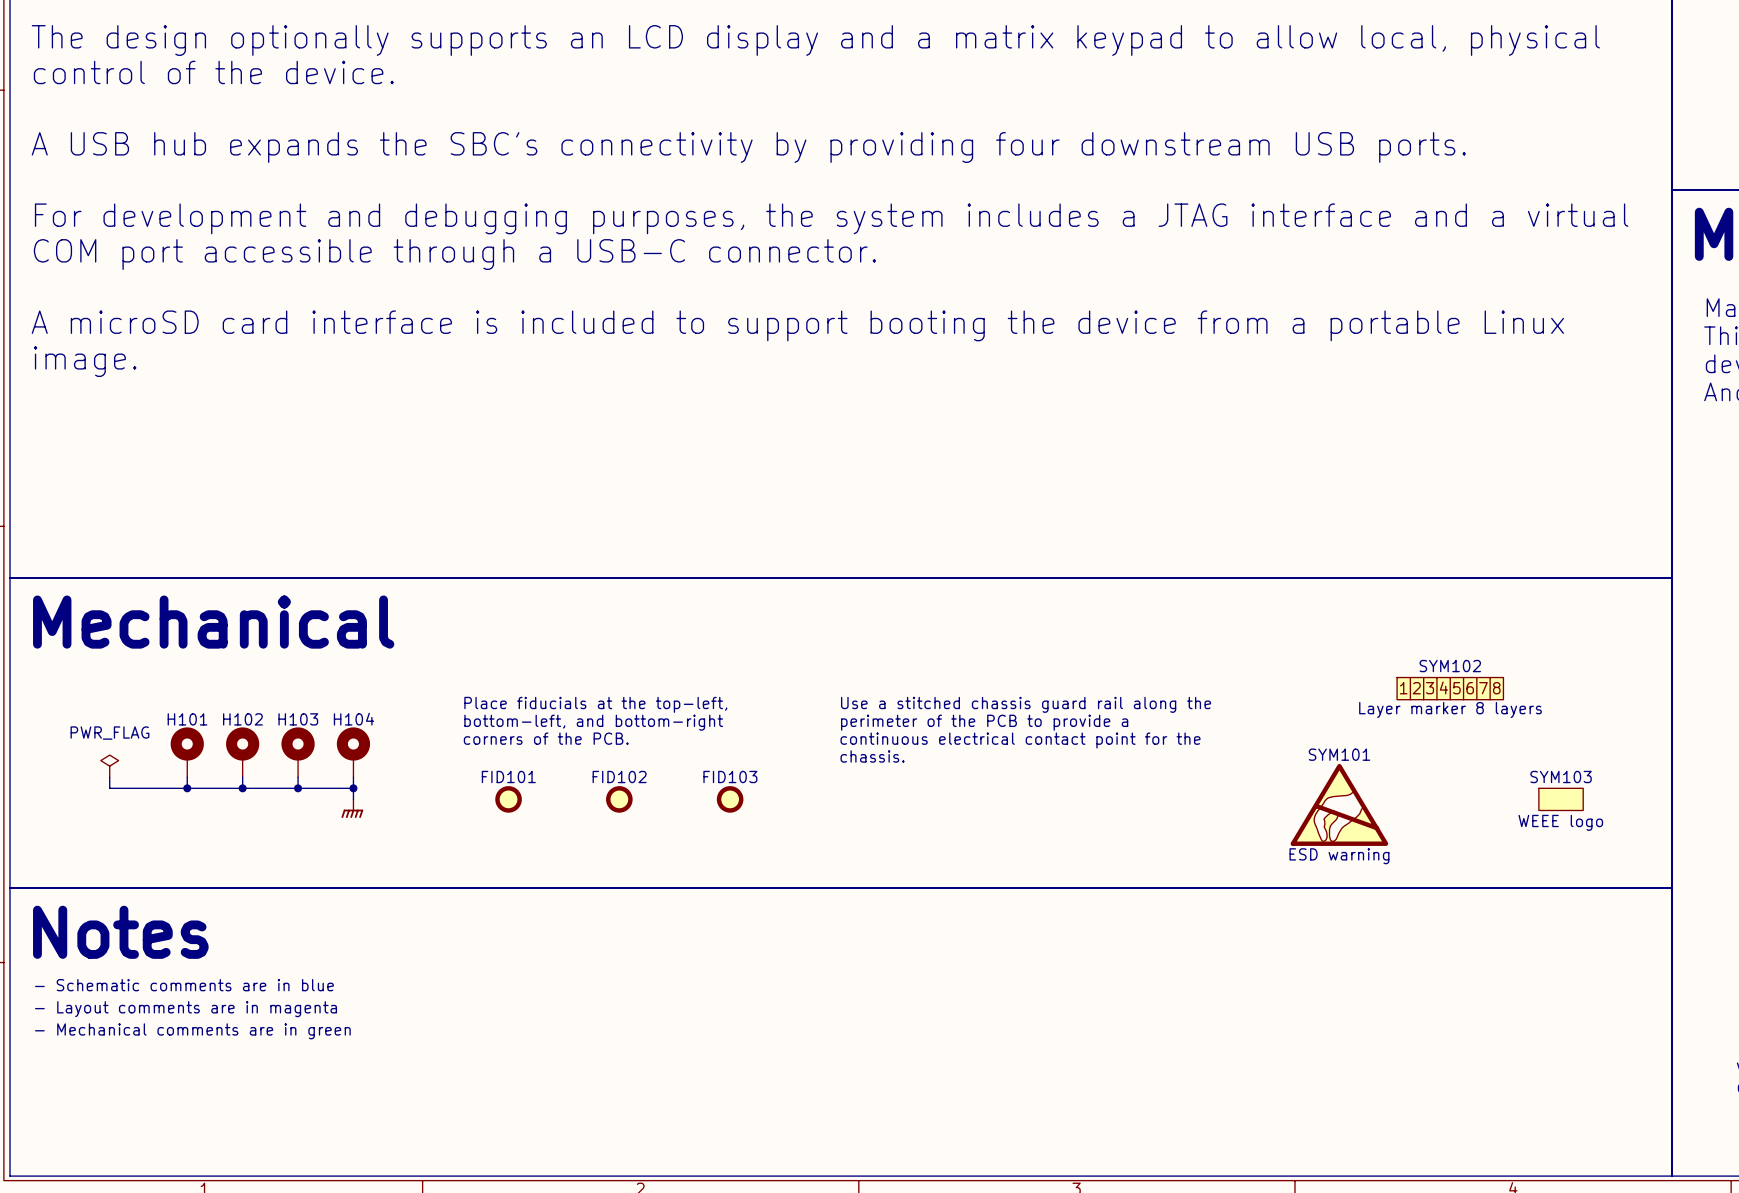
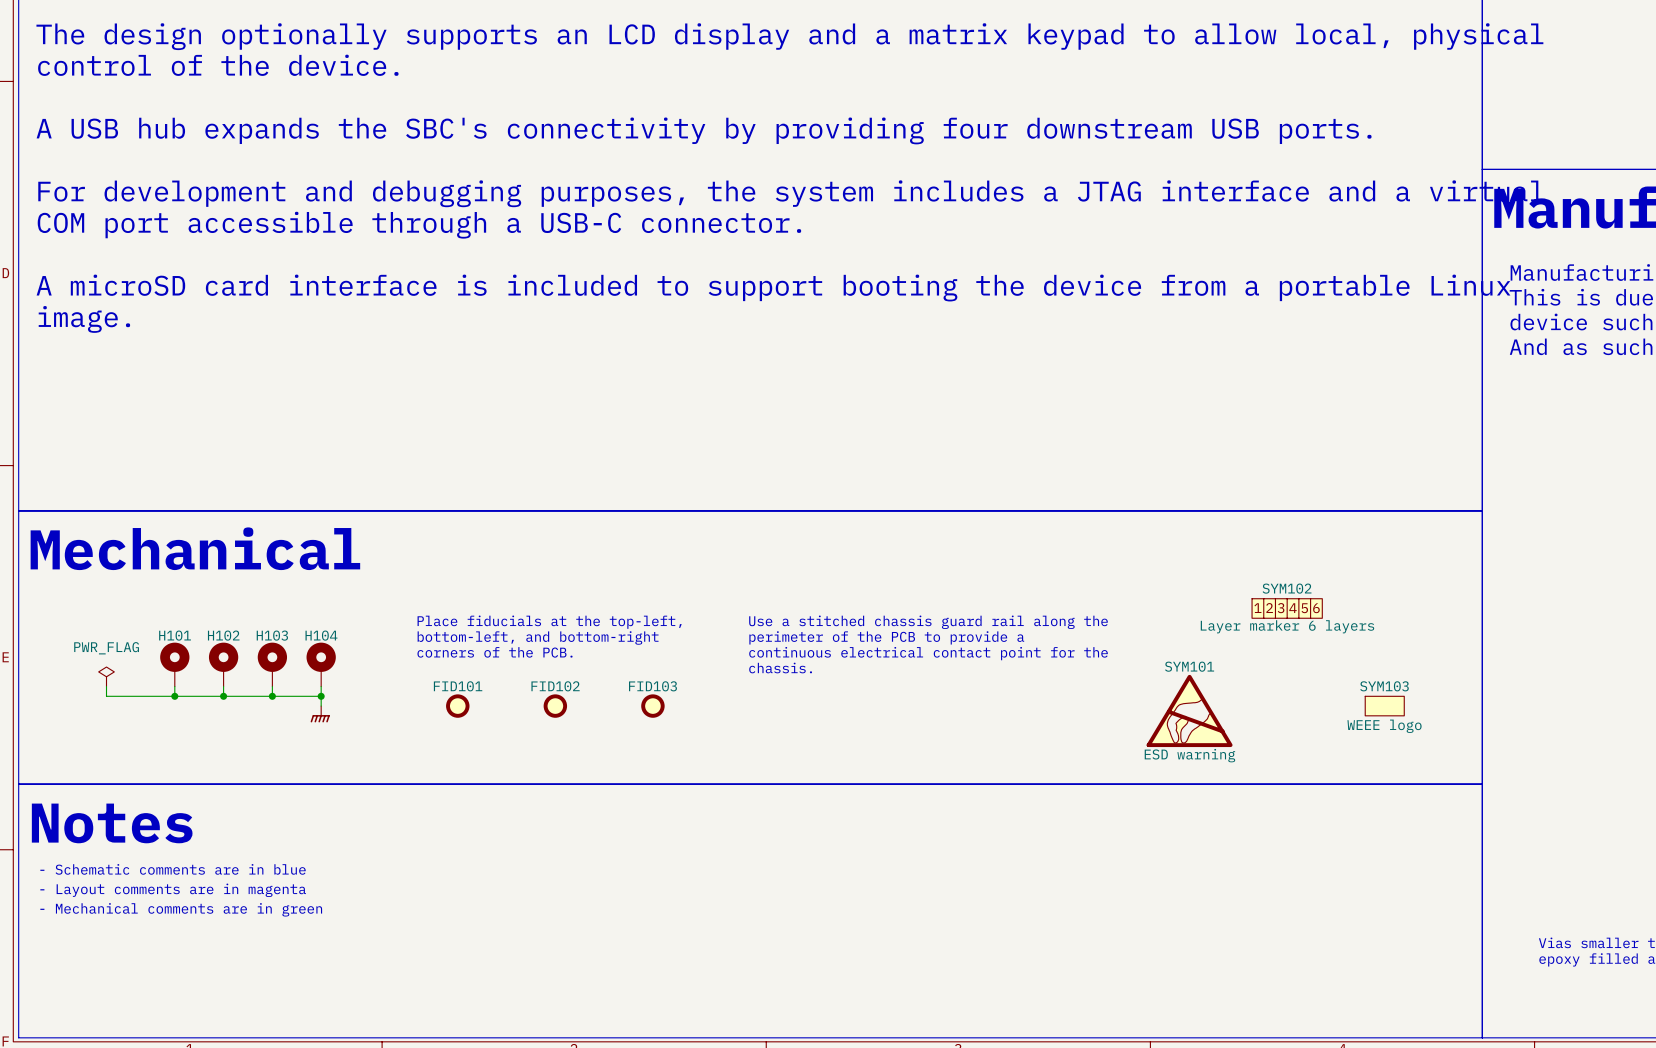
SYM102 symbol: [1397, 677, 1504, 700] -> [1252, 598, 1323, 619]
SYM102 value: Layer marker 8 layers (1450, 709) -> Layer marker 6 layers (1287, 626)

